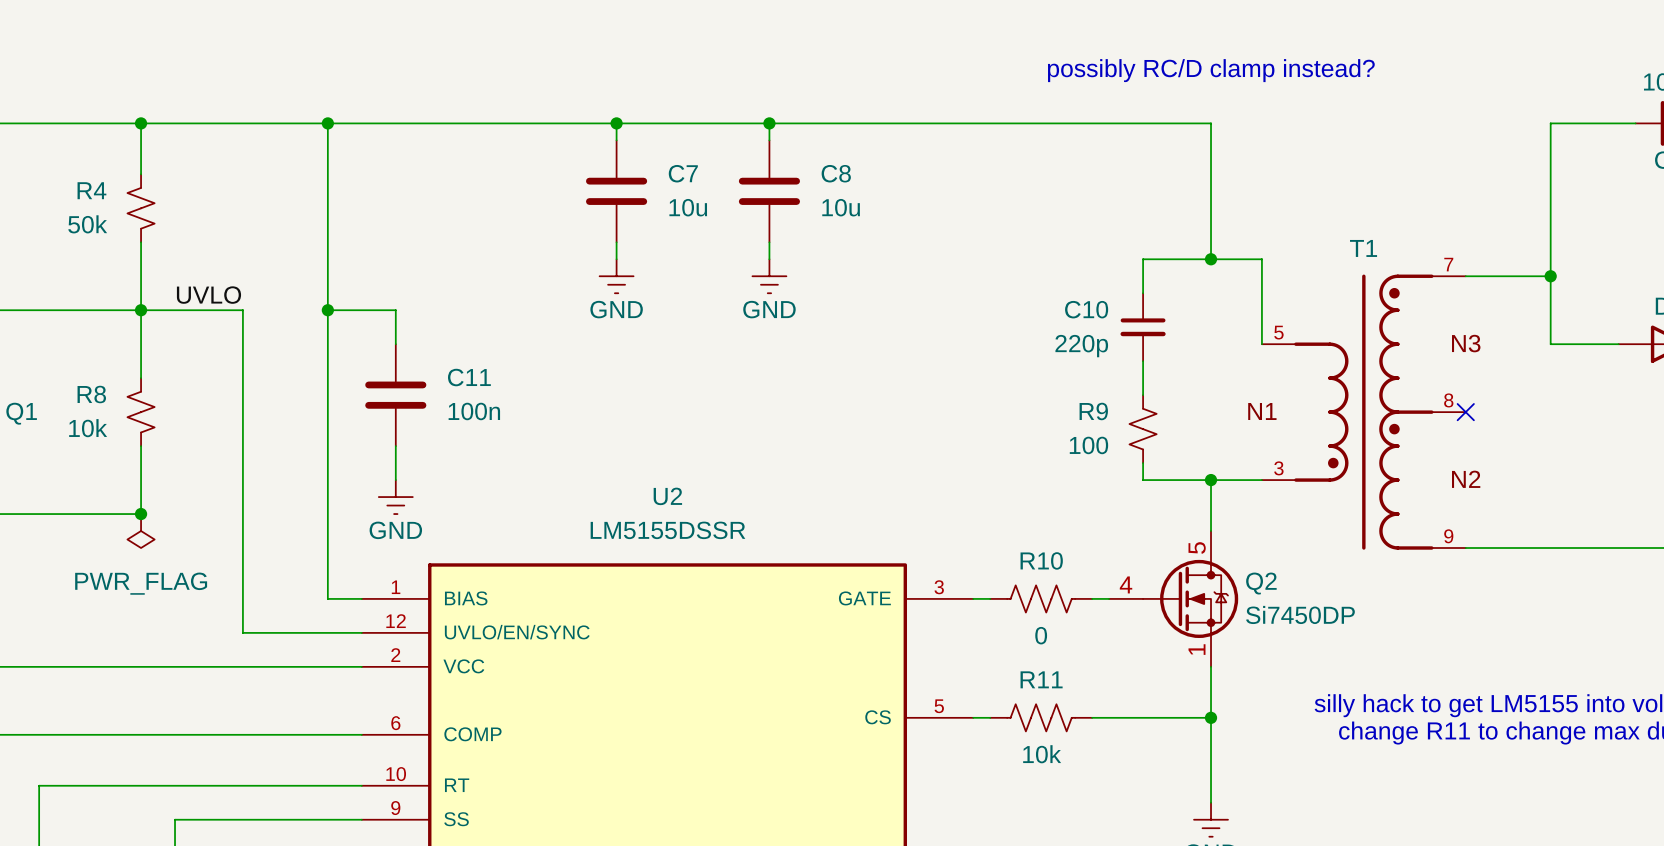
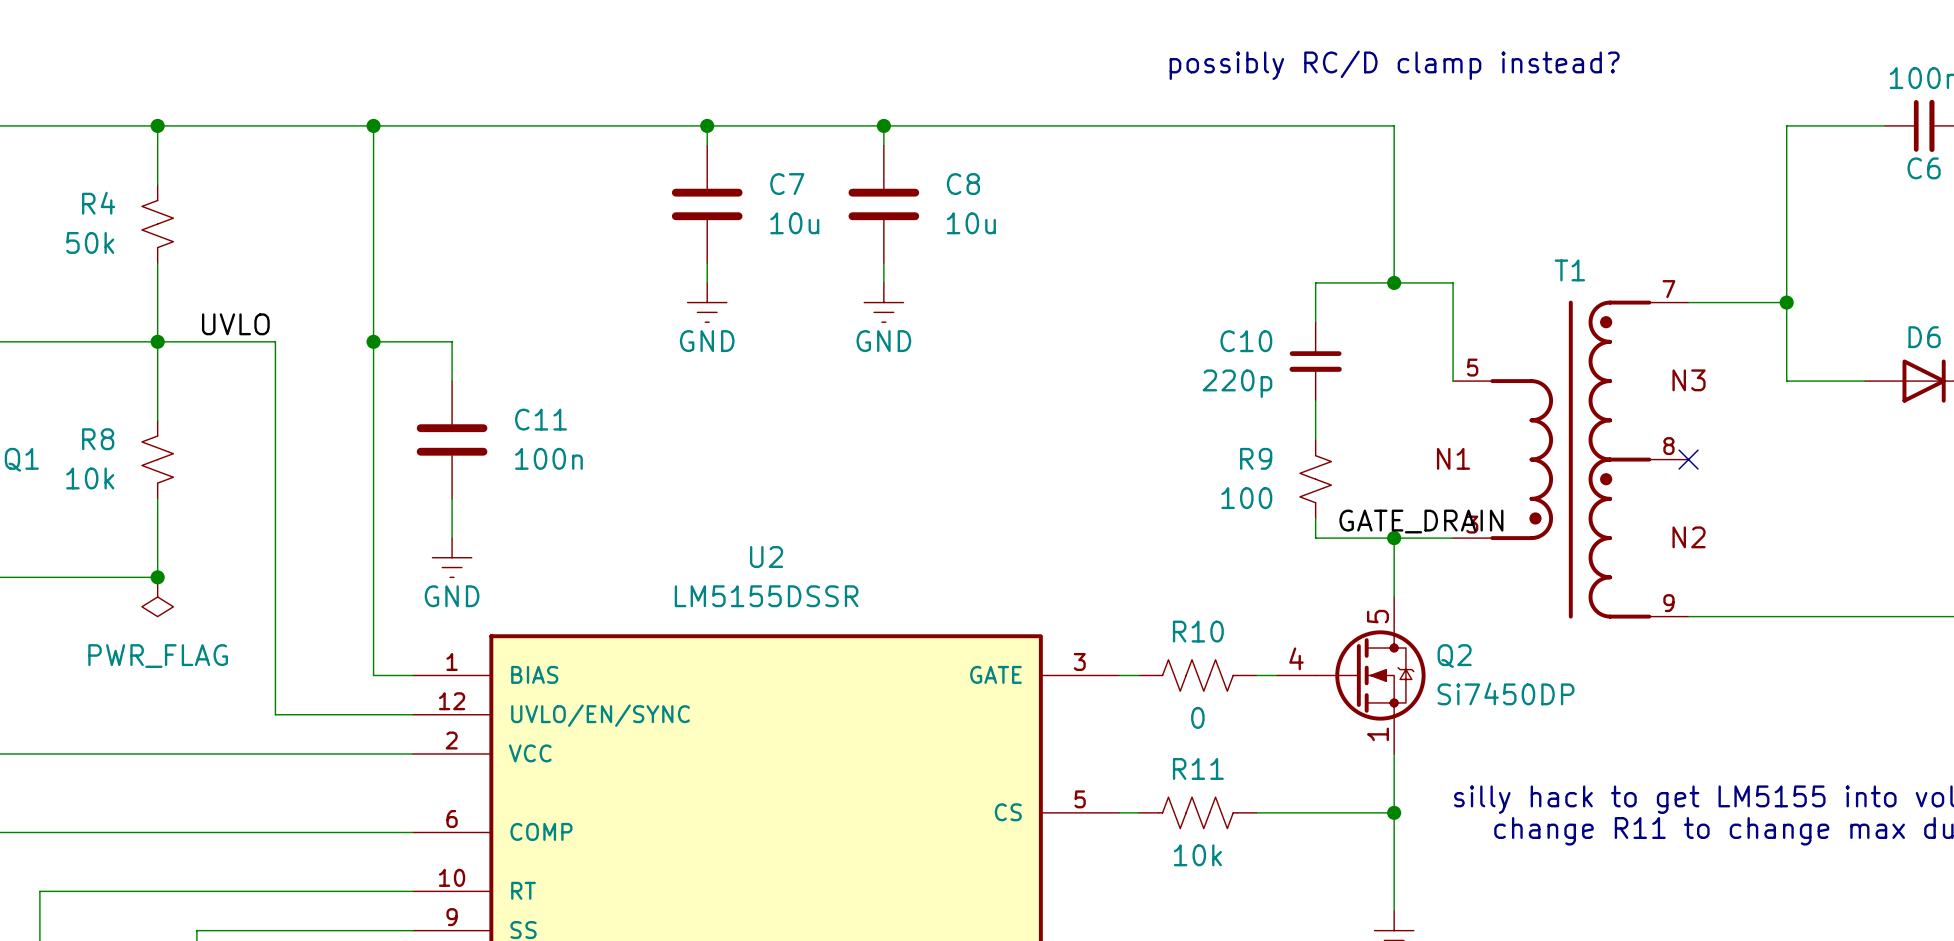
label: none -> GATE_DRAIN (1421, 521)

